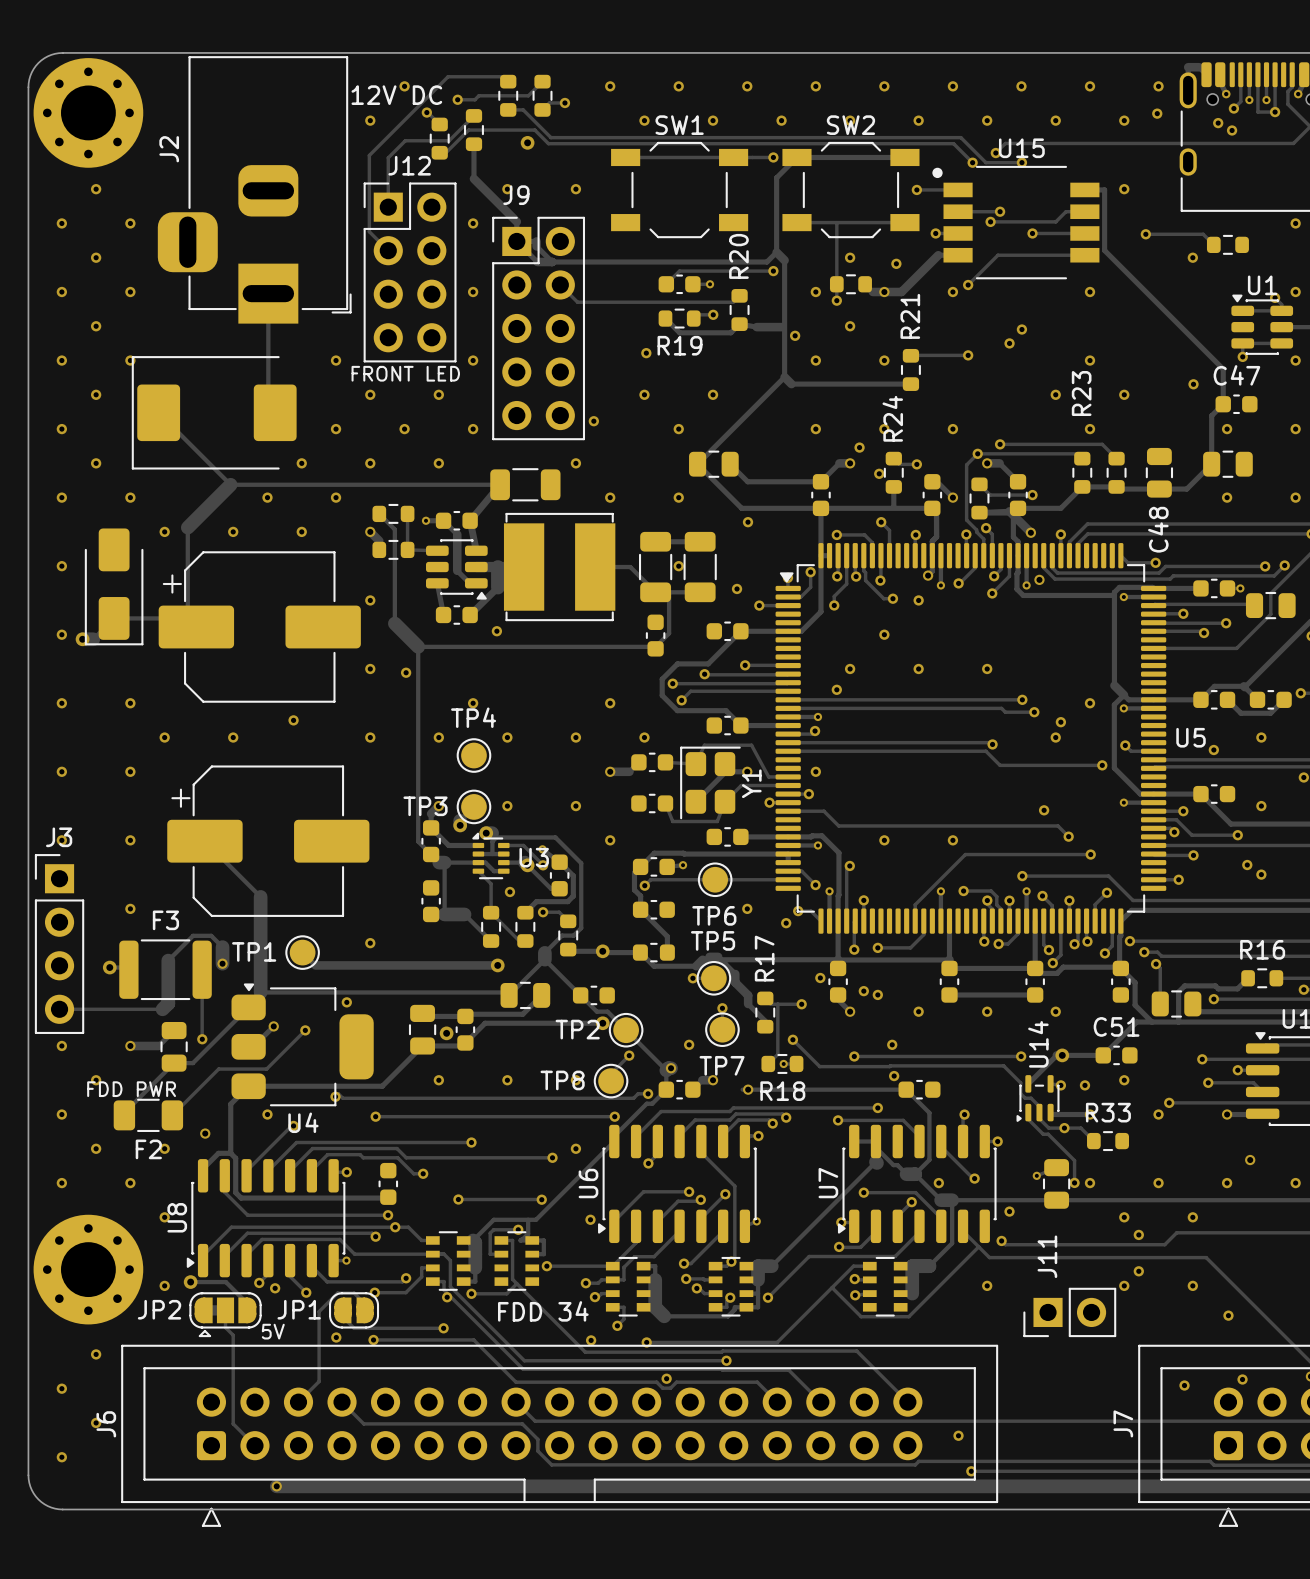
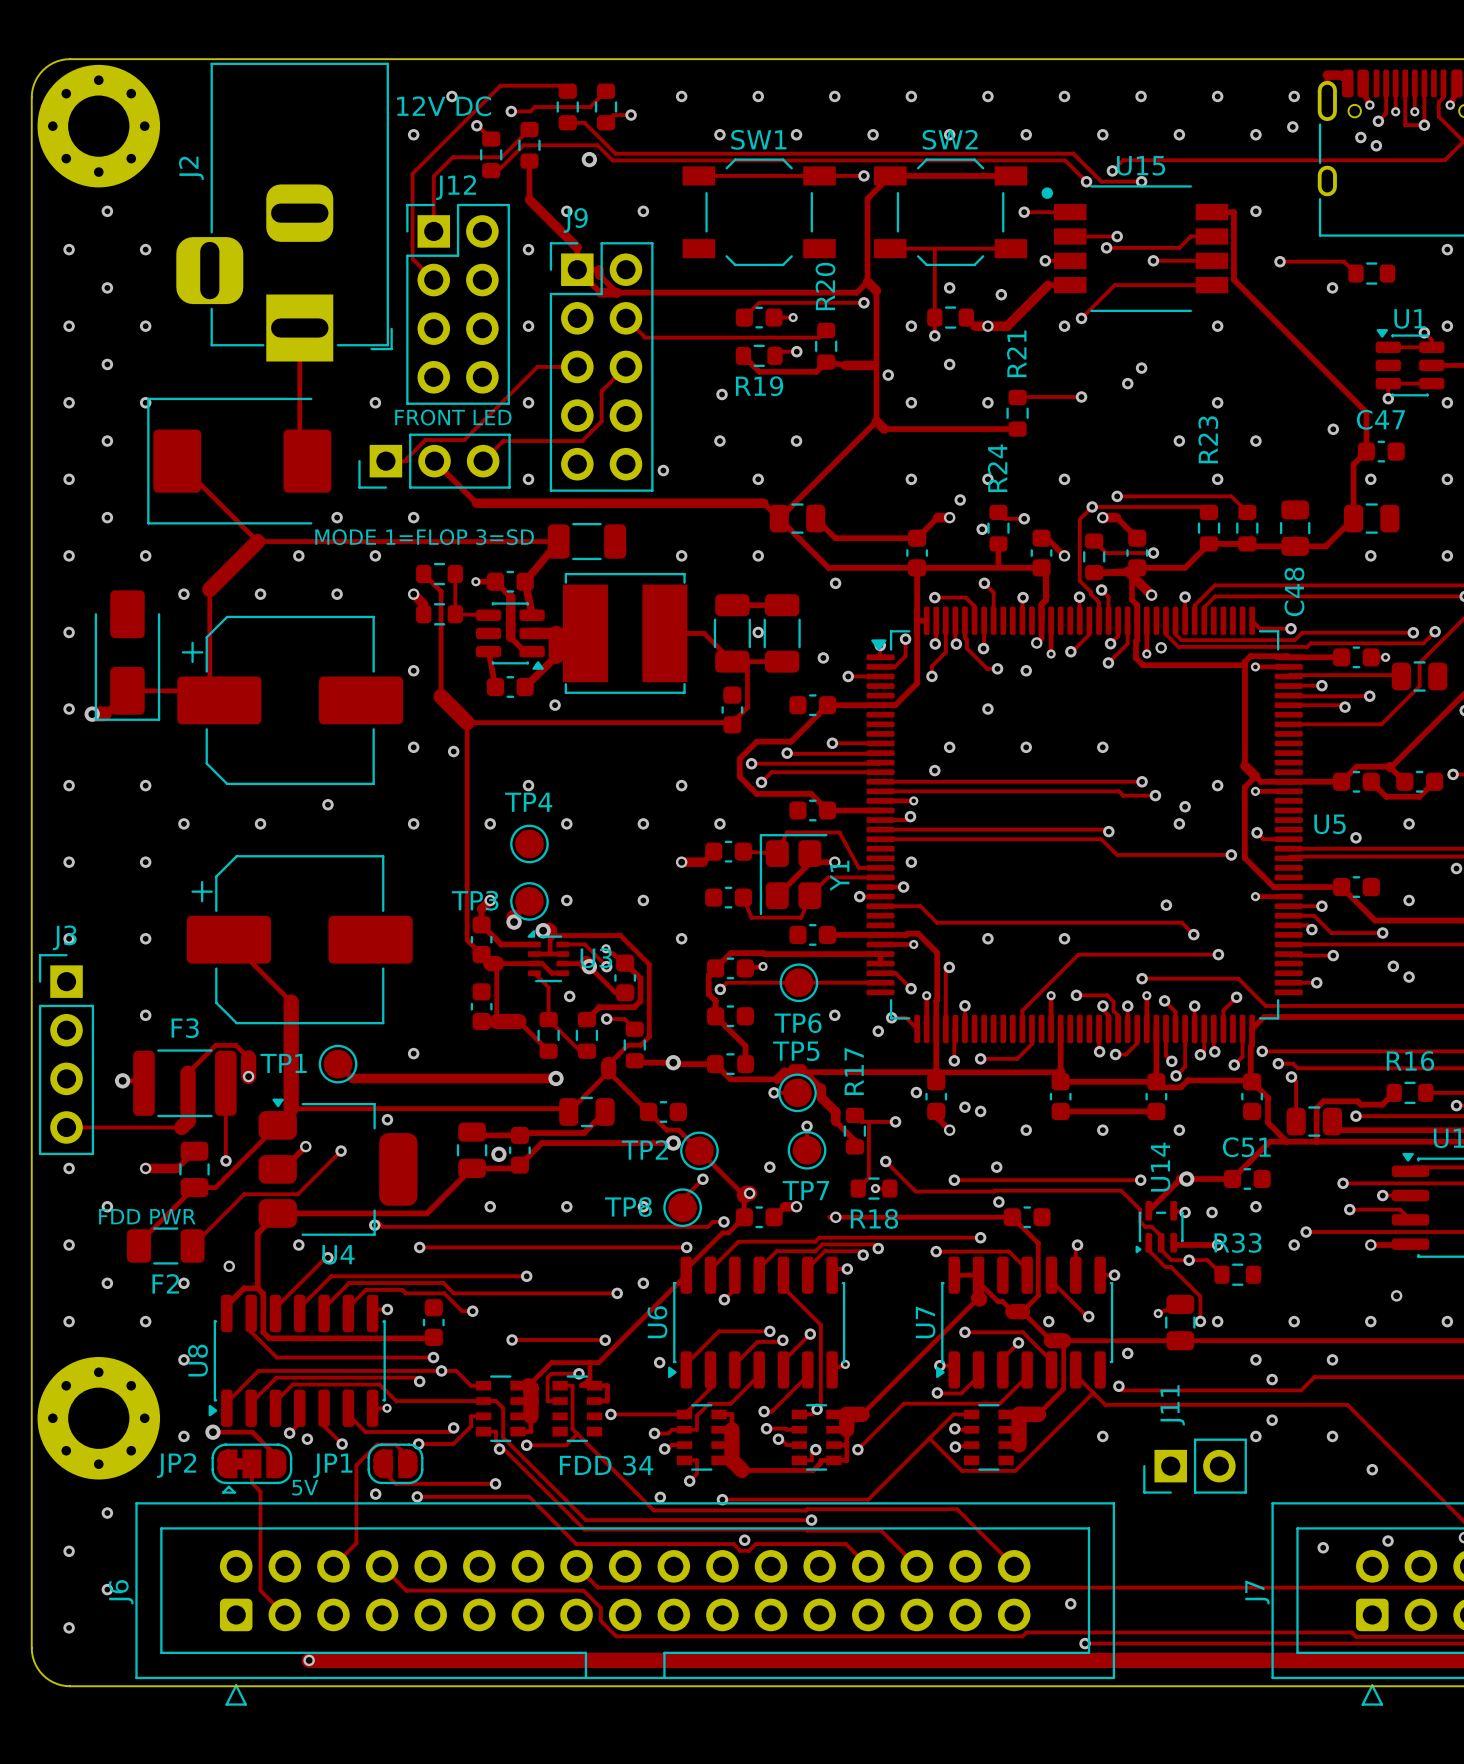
track: none -> (577, 366) (537, 366) (464, 440) (425, 440) (407, 458) (407, 461) (385, 461)
track: none -> (625, 366) (601, 391) (601, 421) (582, 441) (503, 441) (483, 461)
via: (370, 394) -> none
via: (438, 394) -> none
track: none -> (434, 461) (476, 503) (763, 503) (779, 518)
part: none -> (434, 461)
via: (336, 429) -> none
via: (404, 429) -> none
via: (438, 463) -> none
via: (575, 463) -> none
text: none -> MODE 1=FLOP 3=SD (424, 537)

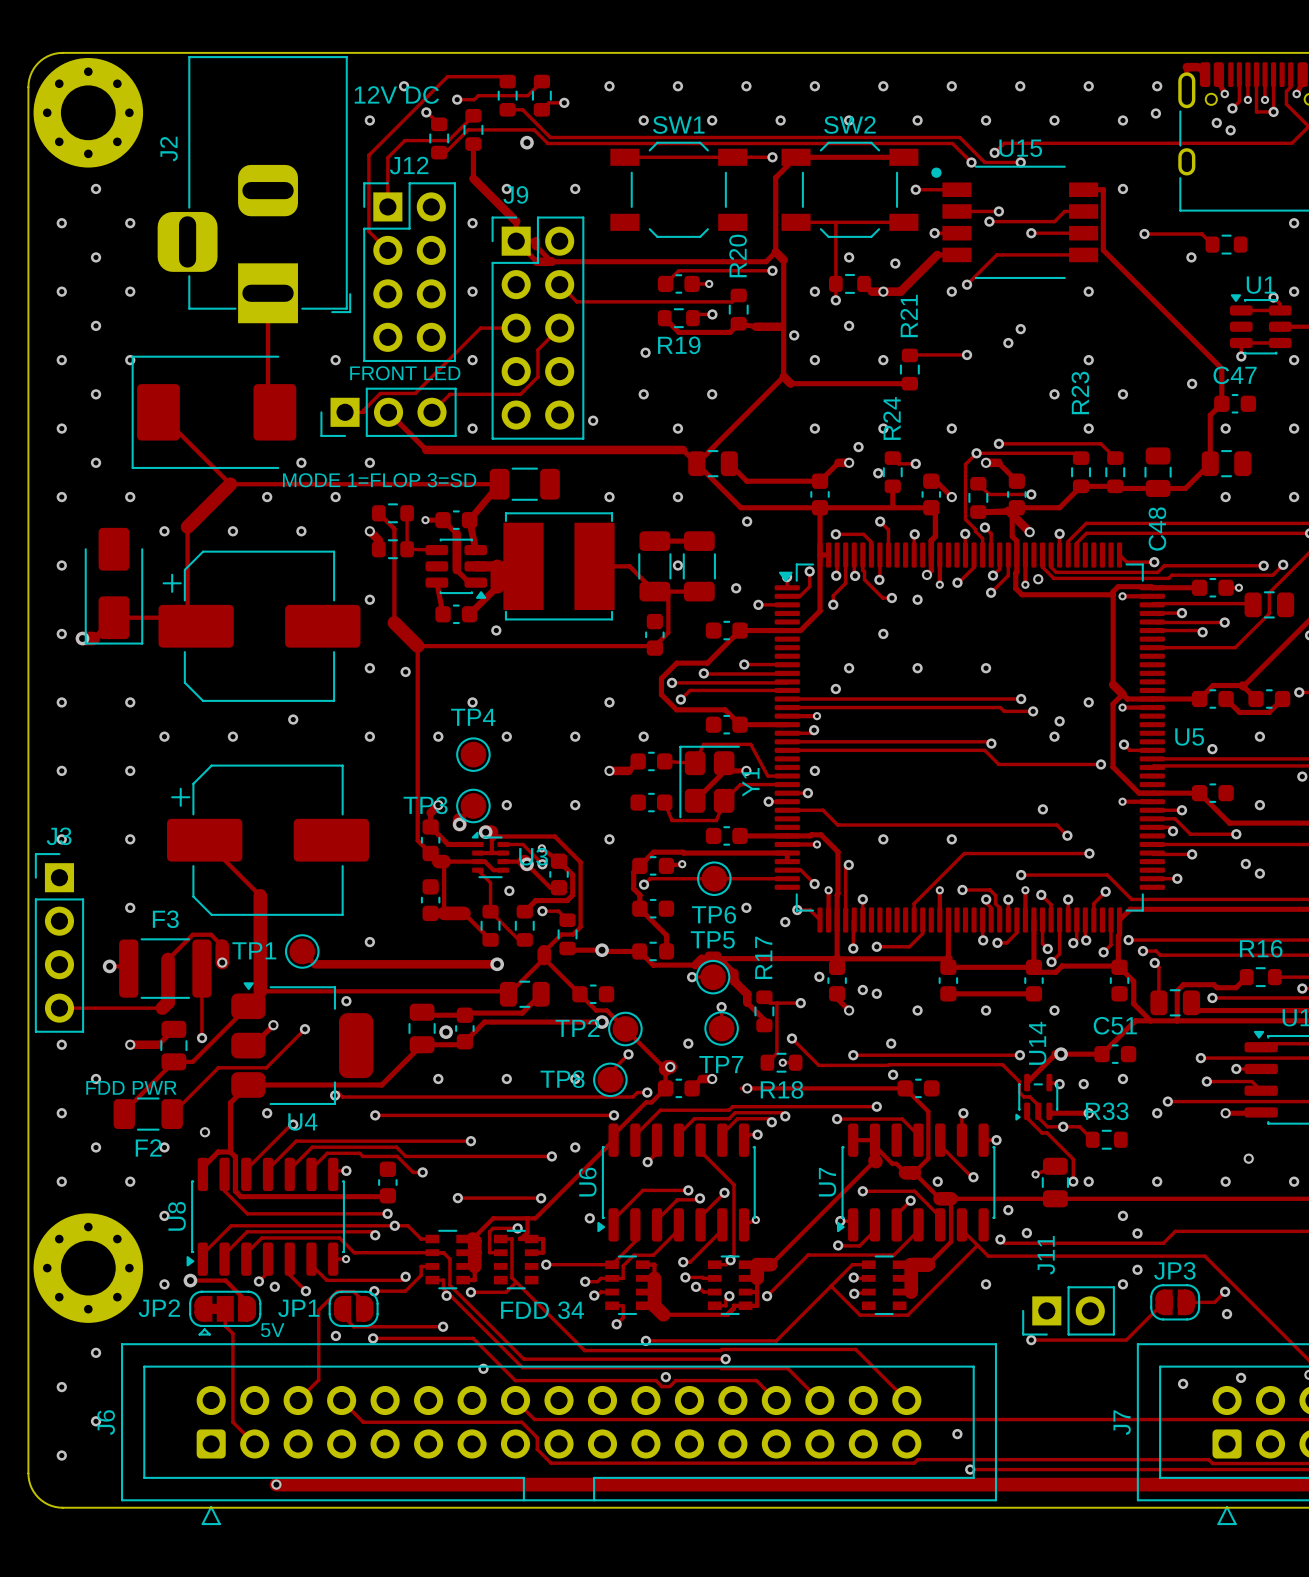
via: (1332, 1359) -> none
via: none -> (1026, 1233)
via position: (1332, 1436) -> (1225, 1291)
track: none -> (1225, 1291) (1214, 1302) (1186, 1302)
track: none -> (1164, 1302) (1126, 1340) (1031, 1340)
JP3: none -> (1175, 1302)
via: (660, 1497) -> none
via: none -> (1031, 1340)
via: none -> (483, 1368)

